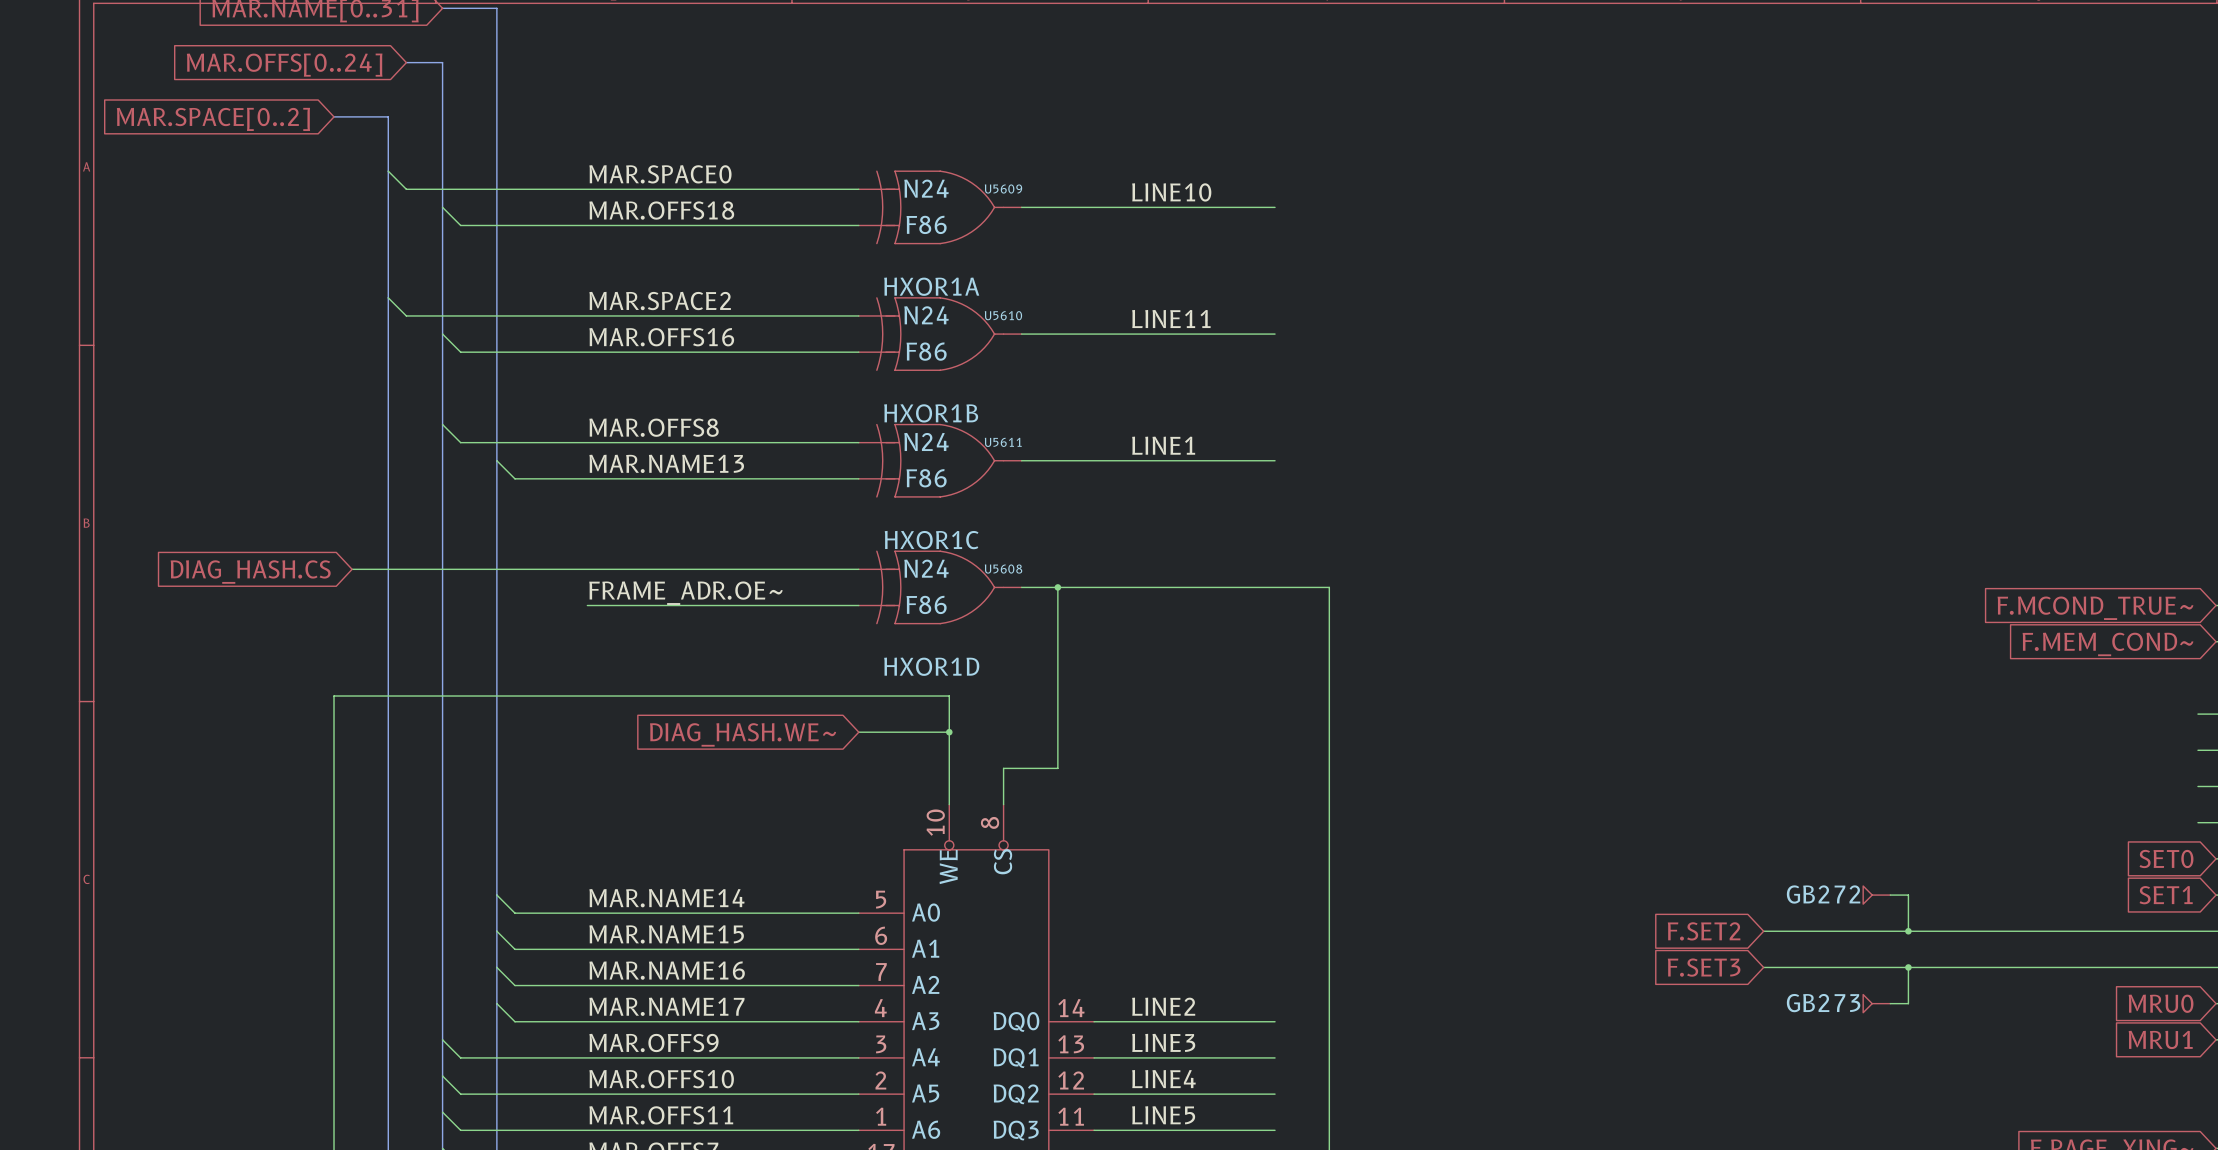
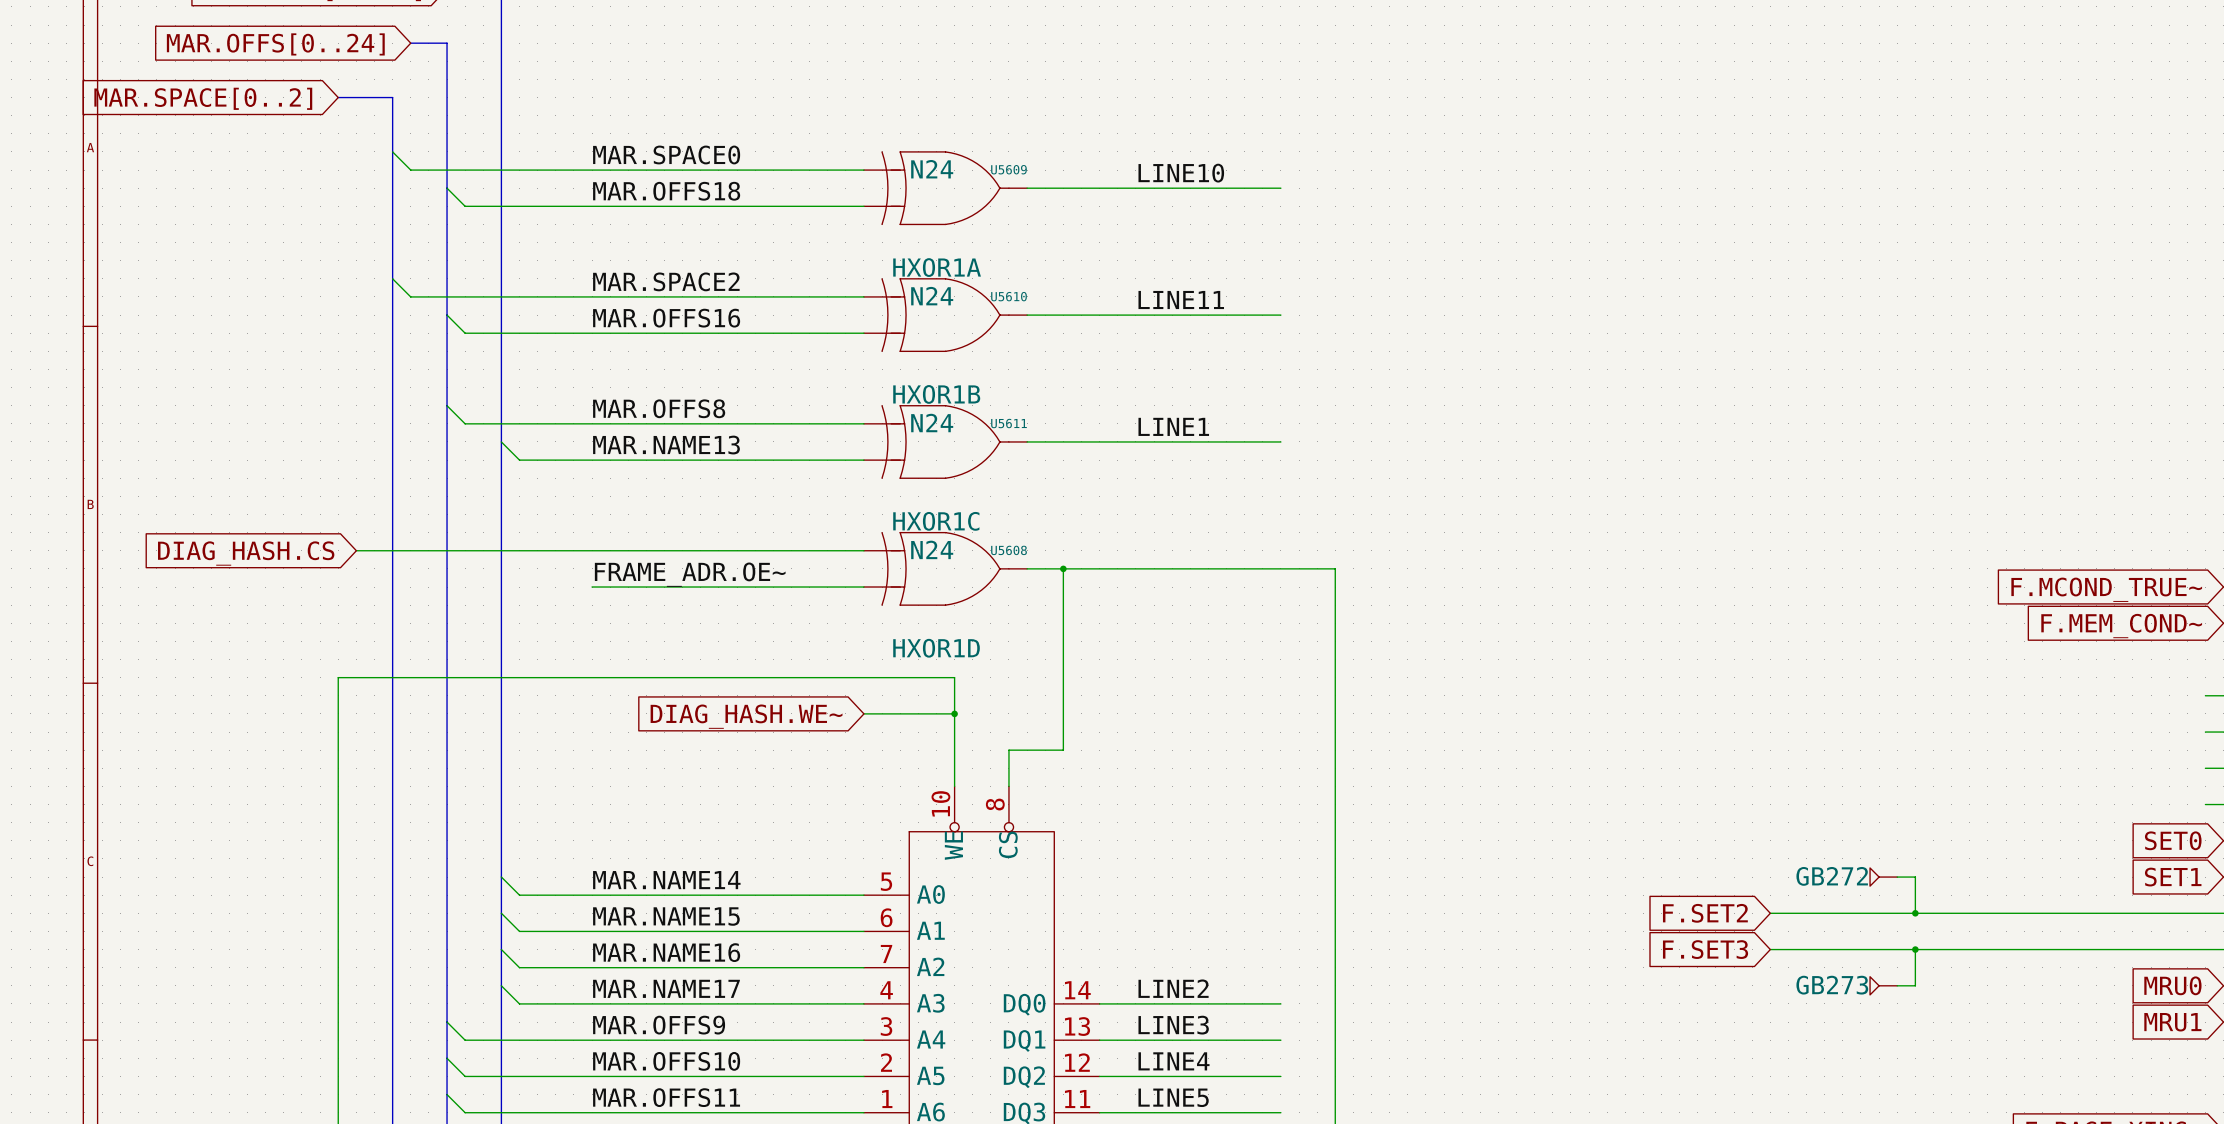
U5609 value: F86 (926, 224) -> none
U5610 value: F86 (926, 351) -> none
U5611 value: F86 (926, 478) -> none
U5608 value: F86 (926, 604) -> none

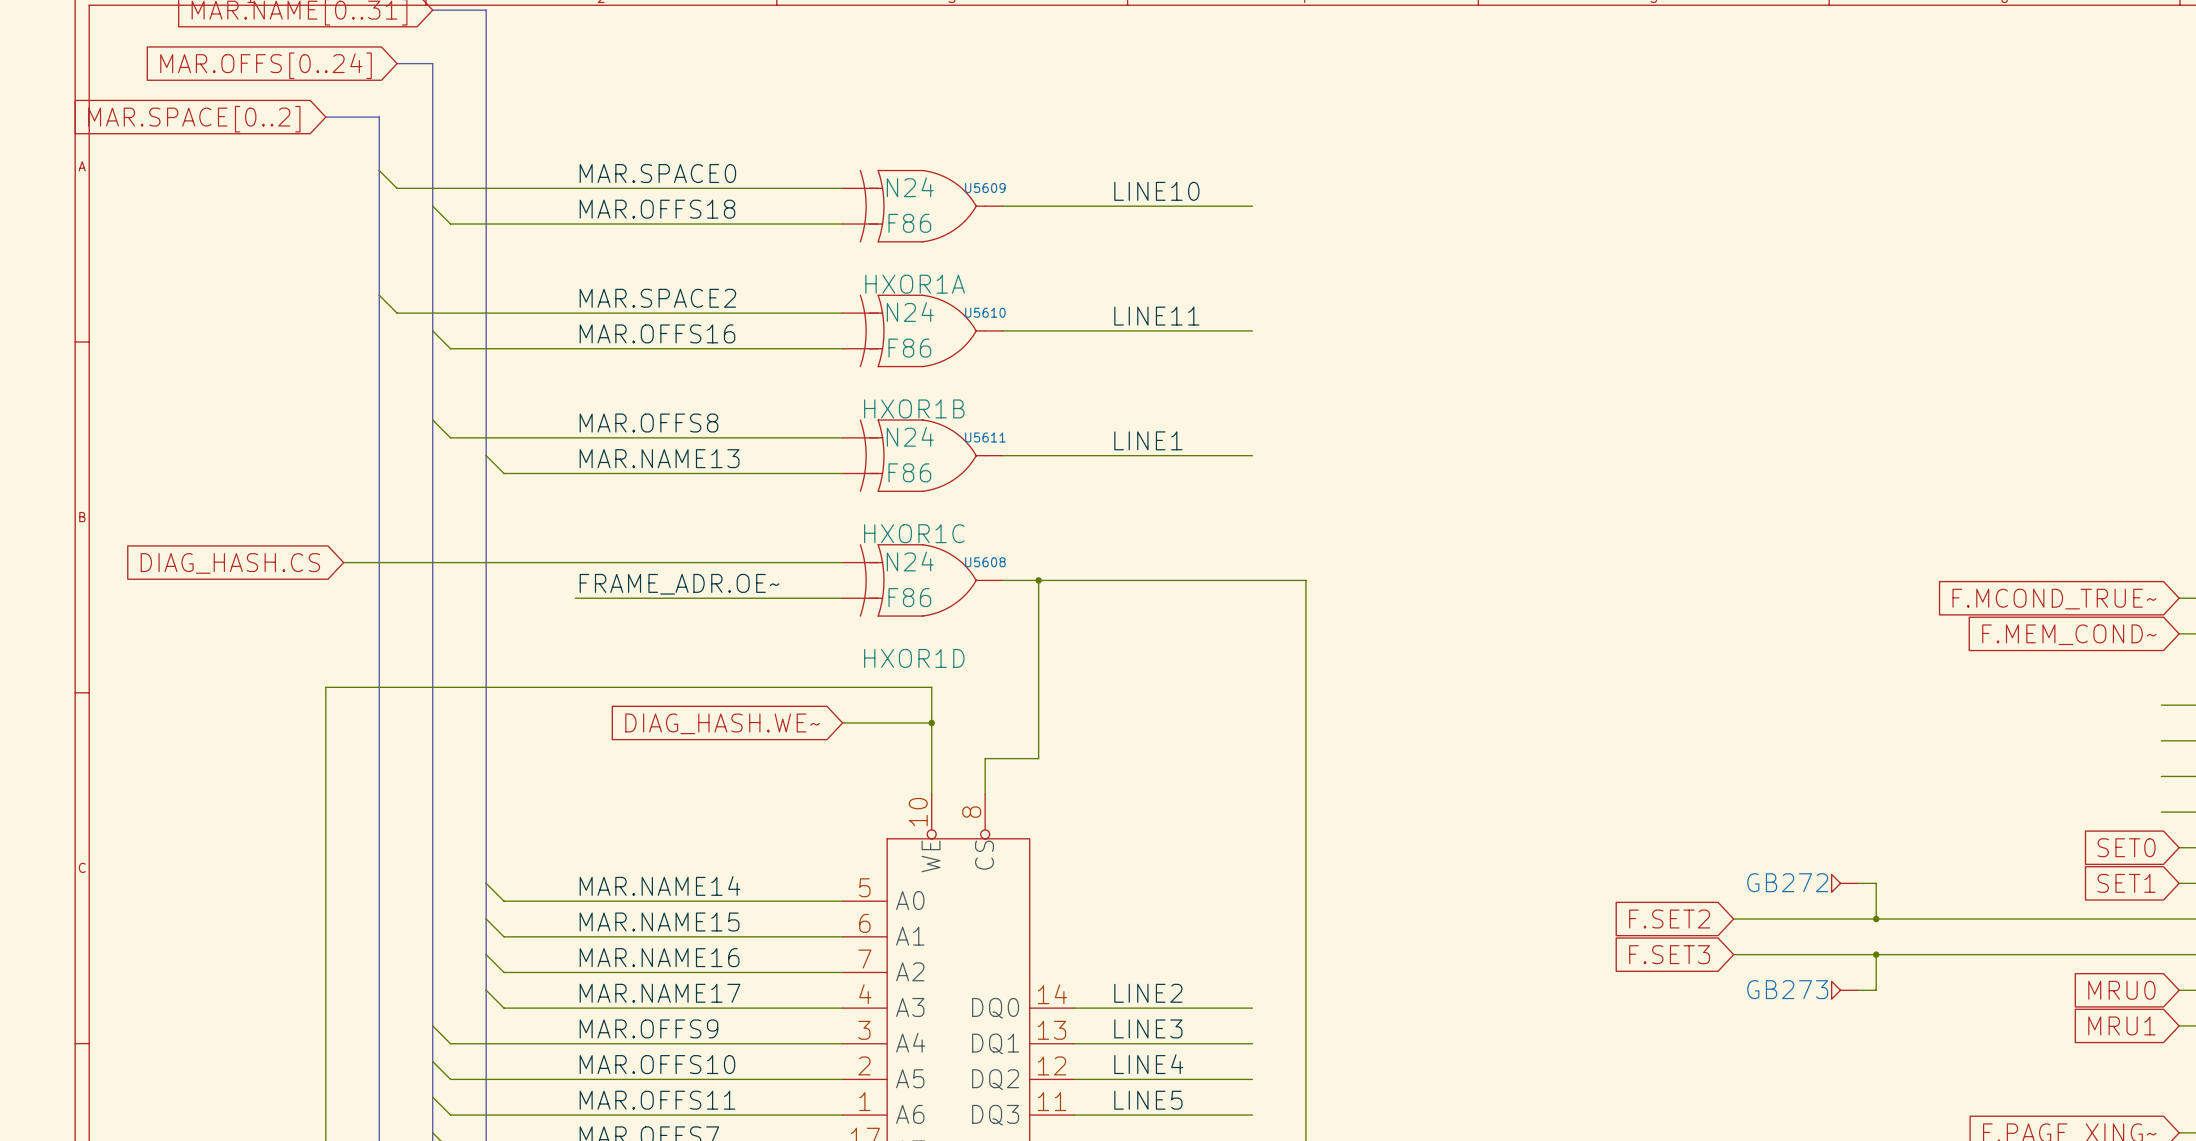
U5609 value: none -> F86 (909, 223)
U5610 value: none -> F86 (909, 348)
U5611 value: none -> F86 (909, 472)
U5608 value: none -> F86 (909, 597)

